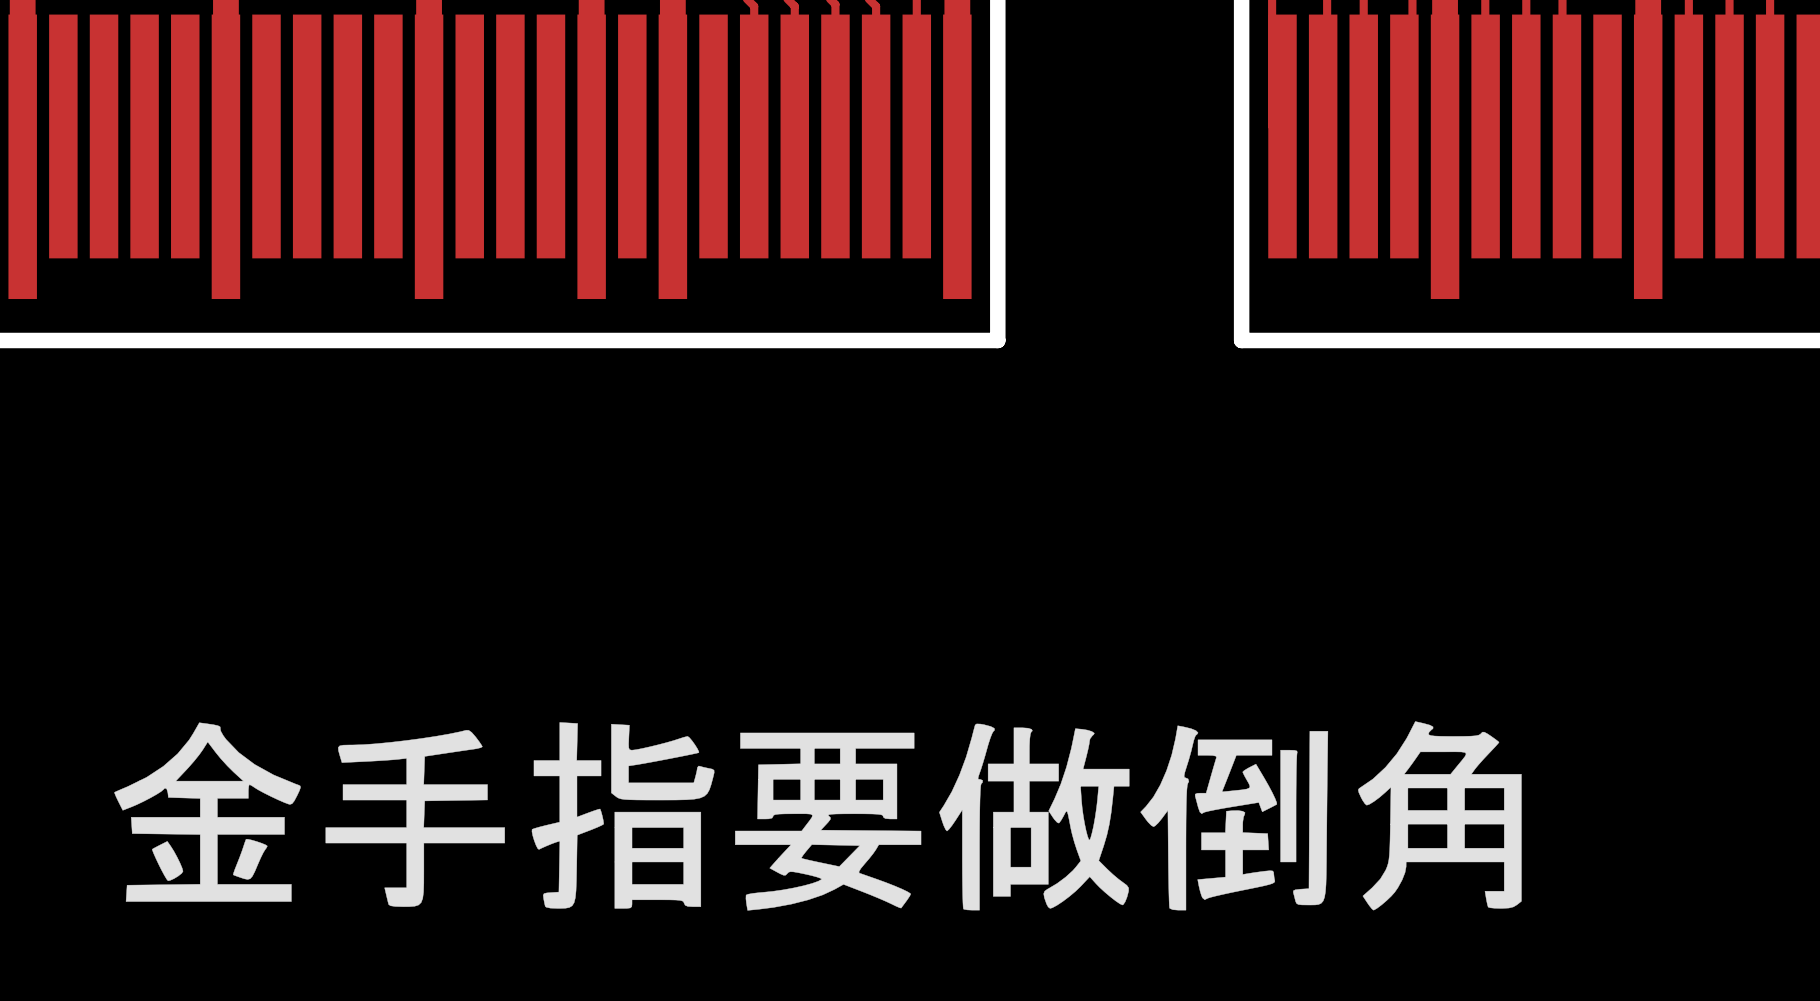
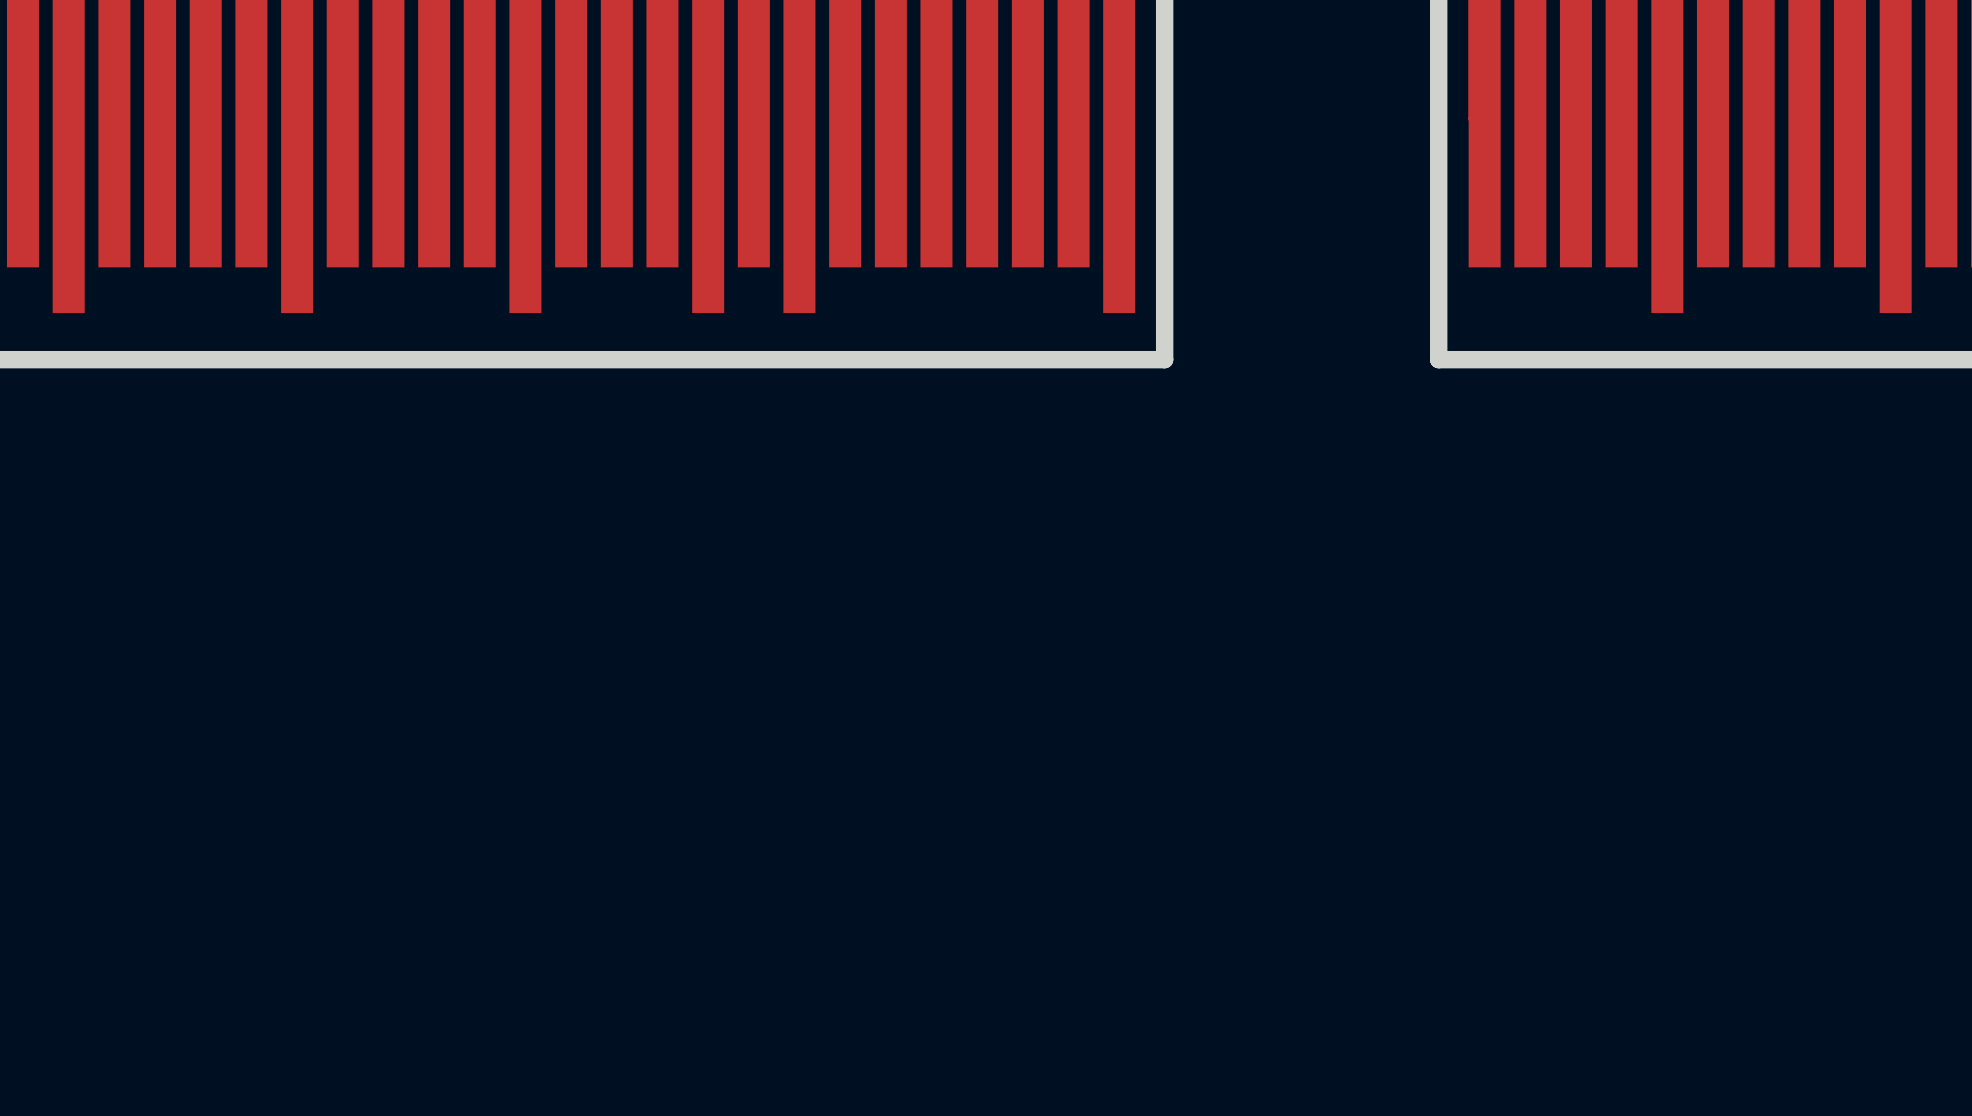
drawing: [114, 721, 1522, 911] -> none

